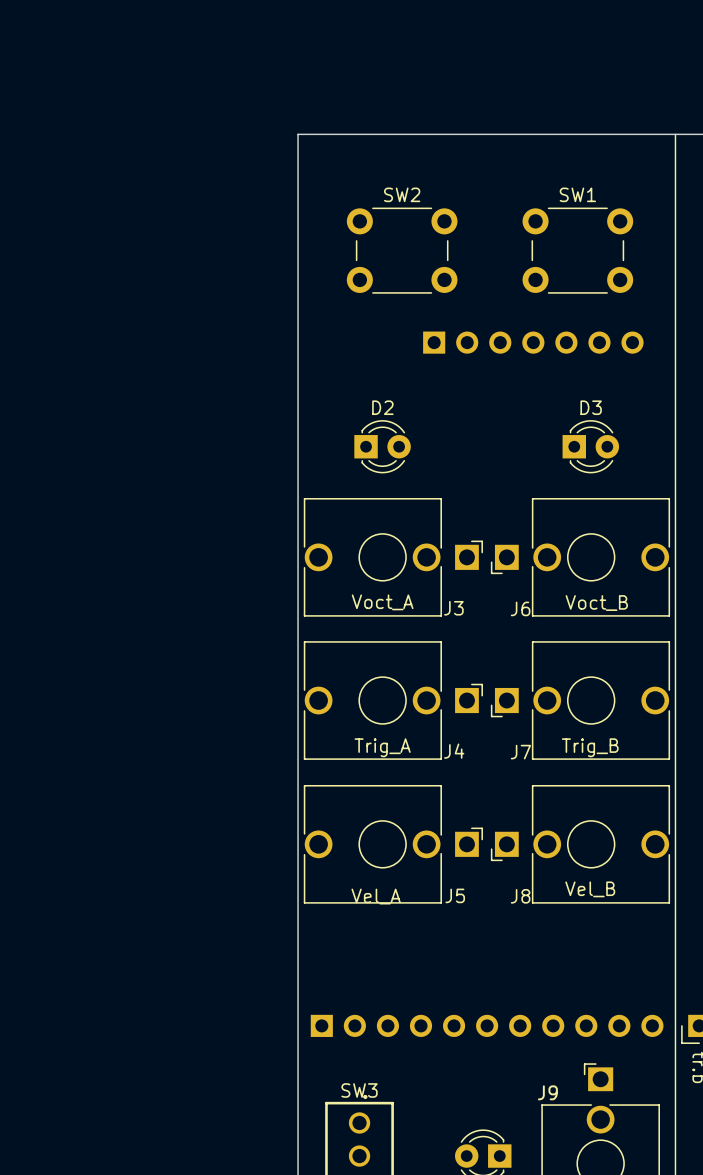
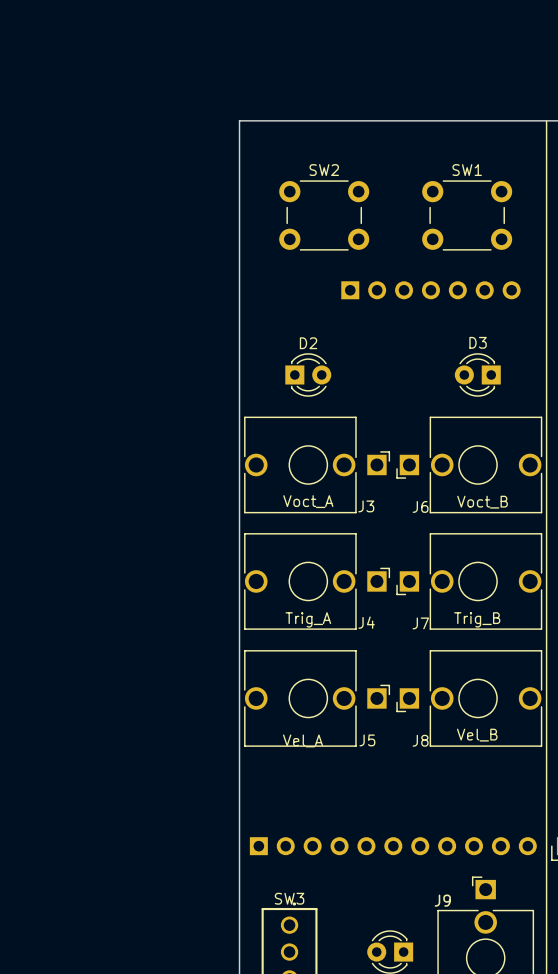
D3 rotation: 0° (590, 446) -> 180° (477, 374)

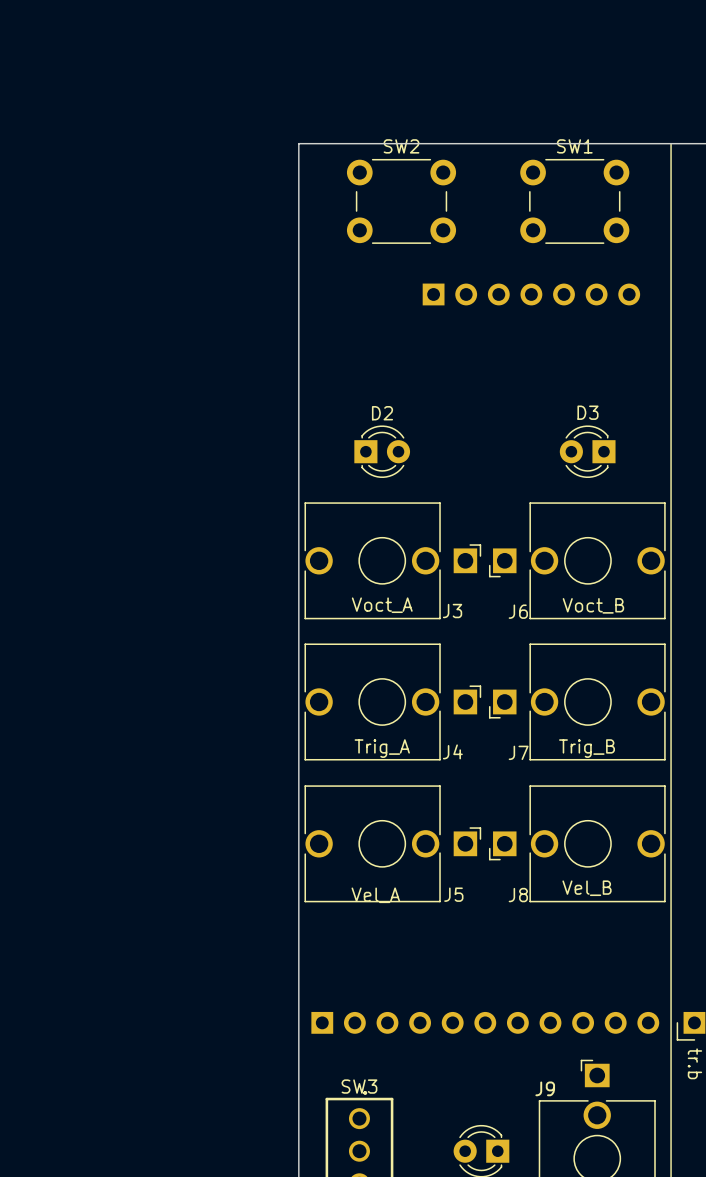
SW2 position: (324, 215) -> (401, 201)
SW1 position: (467, 215) -> (574, 201)
part position: (430, 290) -> (531, 294)

